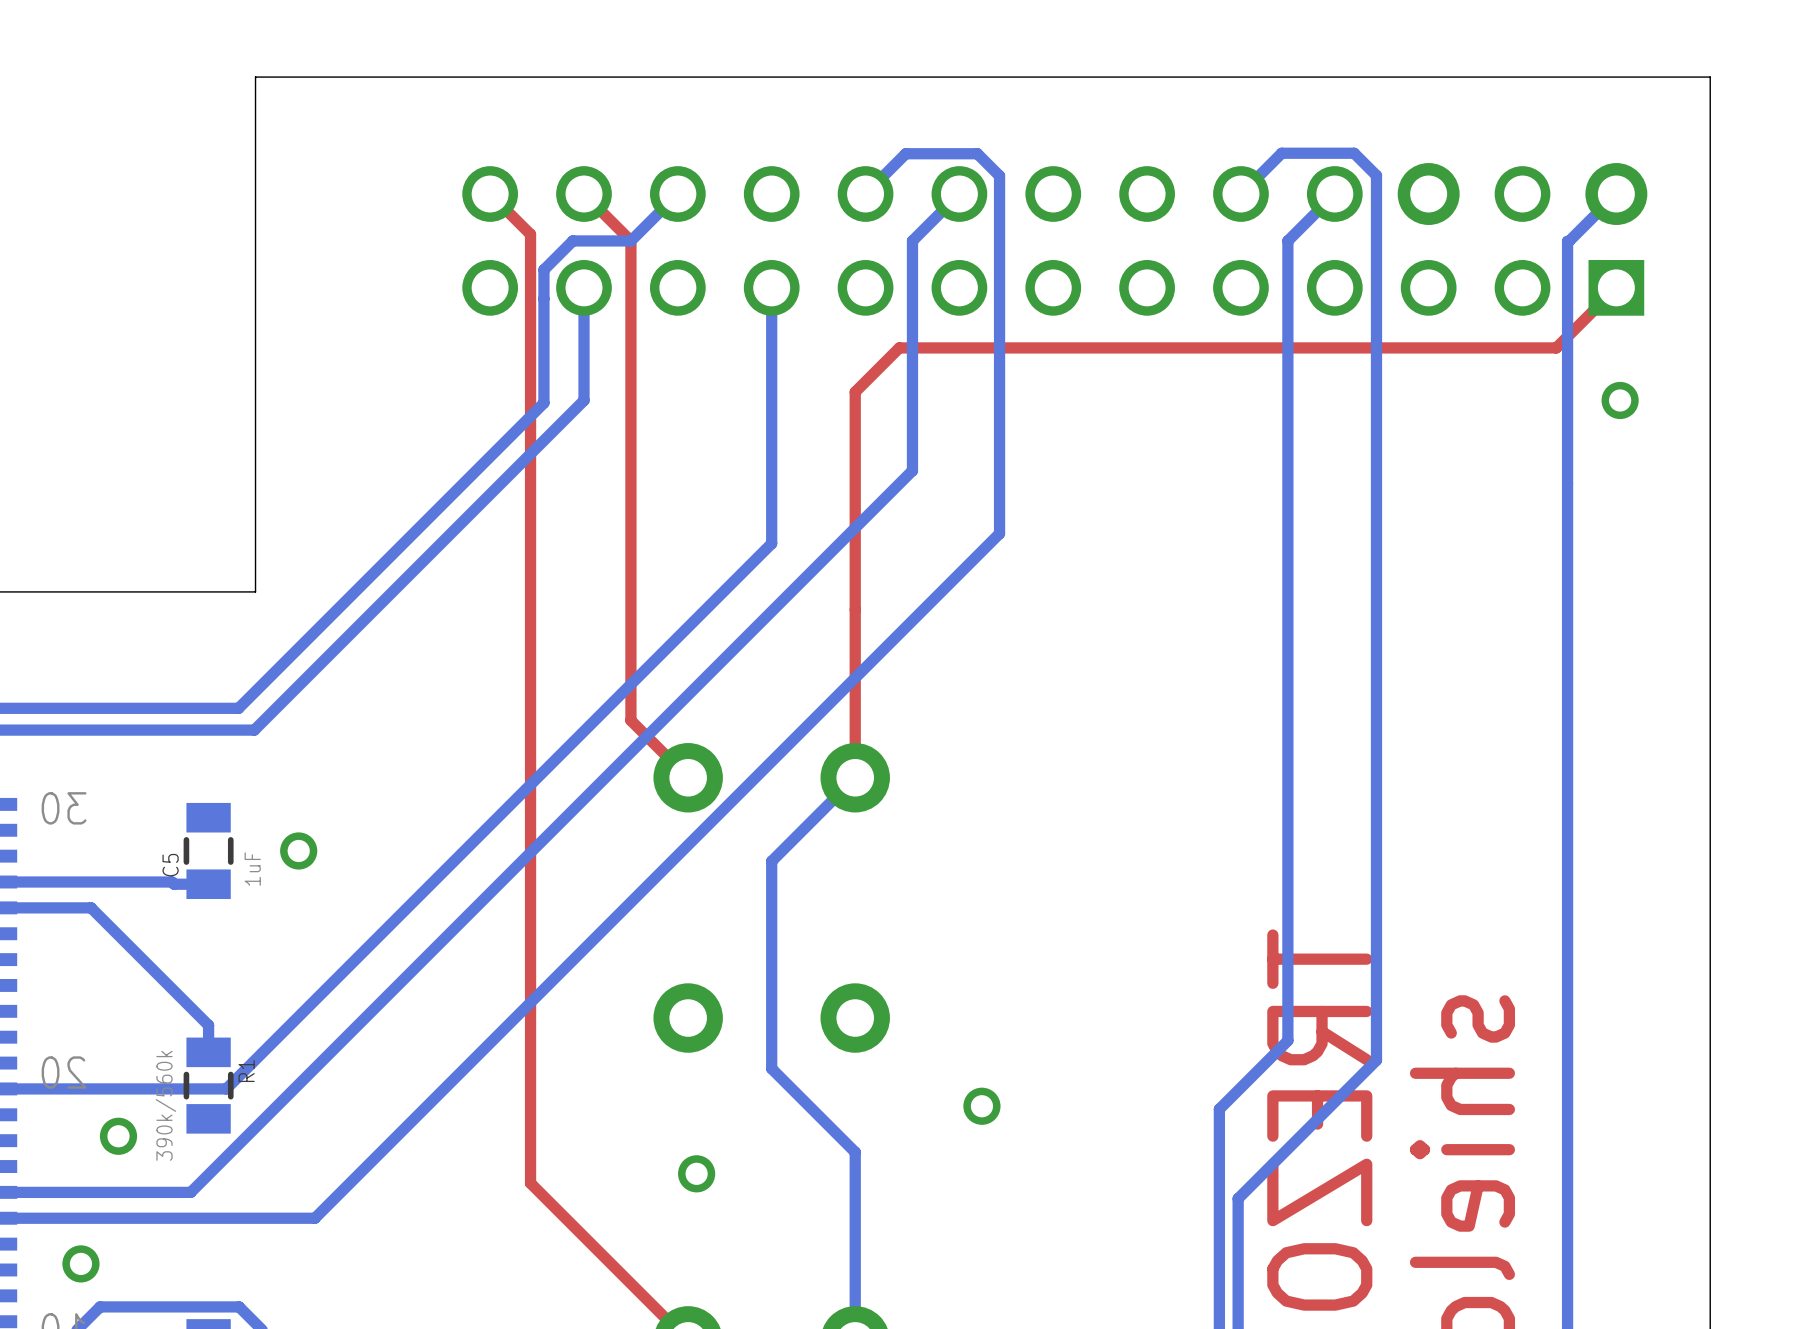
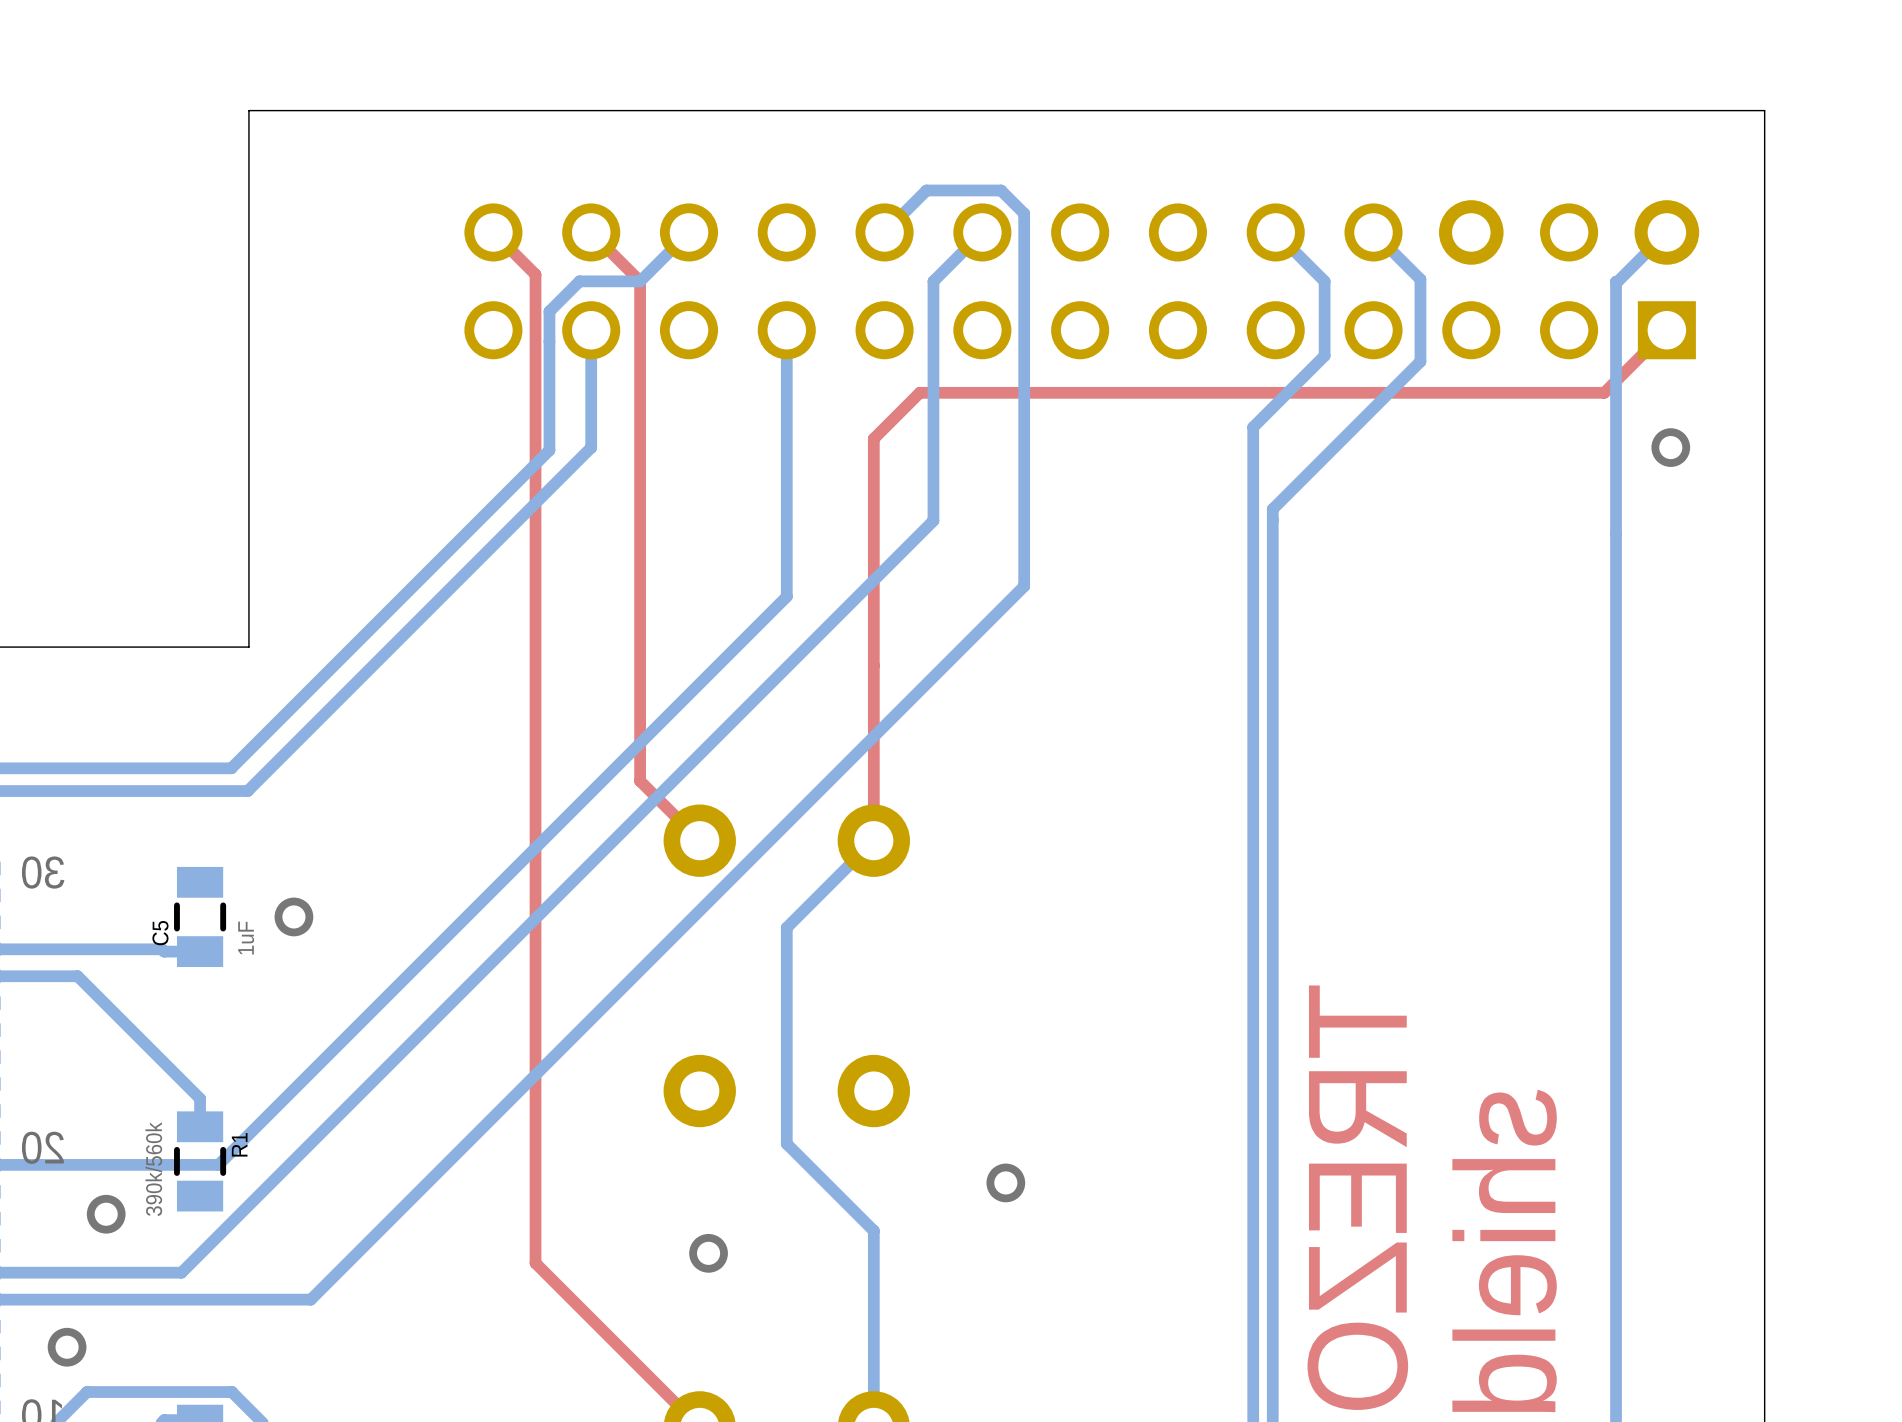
bottom track: (1240, 194) (1281, 153) (1354, 153) (1376, 175) (1376, 1060) (1238, 1198) -> (1373, 232) (1420, 279) (1420, 361) (1272, 509) (1272, 1279)
bottom track: (1334, 194) (1287, 240) -> (1275, 232) (1324, 281)
bottom track: (1287, 312) (1287, 1040) (1219, 1109) -> (1324, 355) (1253, 427) (1253, 1186)

